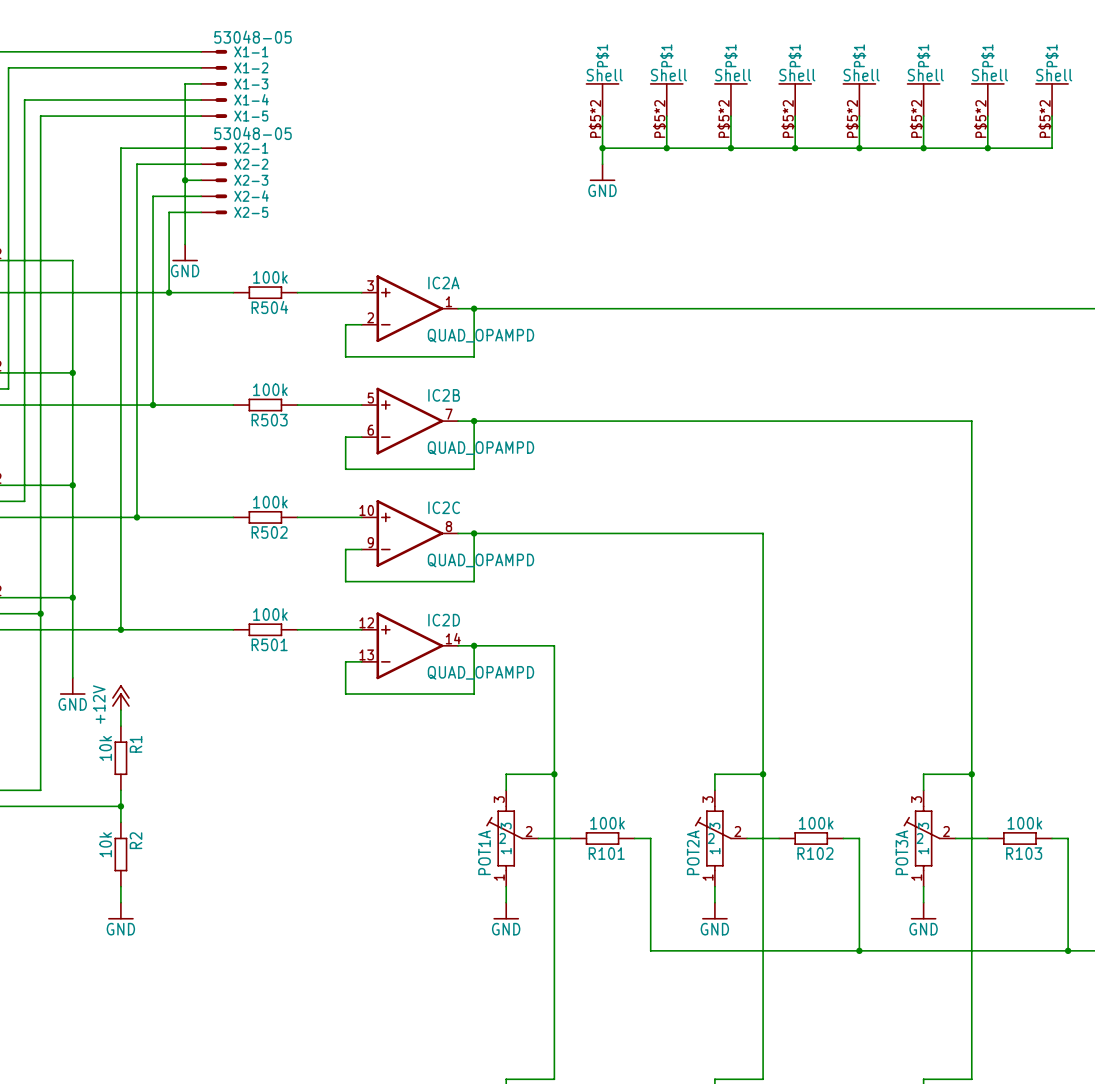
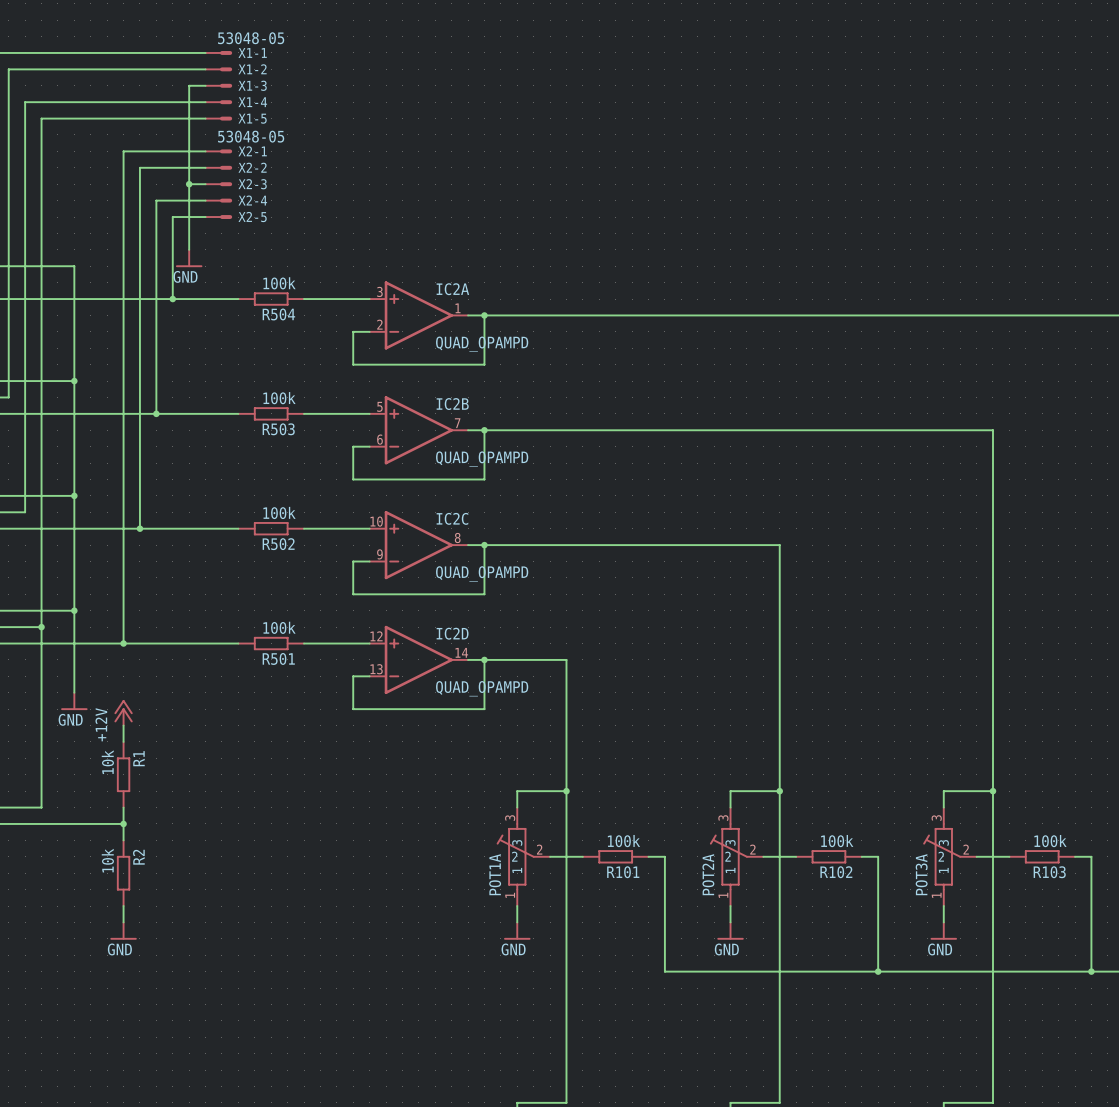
part: (602, 99) -> none
part: (666, 99) -> none
part: (730, 99) -> none
part: (795, 99) -> none
part: (859, 99) -> none
part: (923, 99) -> none
part: (987, 99) -> none
part: (1052, 99) -> none
wire: (602, 116) (602, 164) -> none
wire: (666, 116) (666, 148) -> none
wire: (730, 116) (730, 148) -> none
wire: (795, 116) (795, 148) -> none
wire: (859, 116) (859, 148) -> none
wire: (923, 116) (923, 148) -> none
wire: (987, 116) (987, 148) -> none
wire: (1052, 116) (1052, 148) (602, 148) -> none
junction: (602, 148) -> none
junction: (666, 148) -> none
junction: (730, 148) -> none
junction: (795, 148) -> none
junction: (859, 148) -> none
junction: (923, 148) -> none
junction: (987, 148) -> none
power symbol: GND (602, 172) -> none

